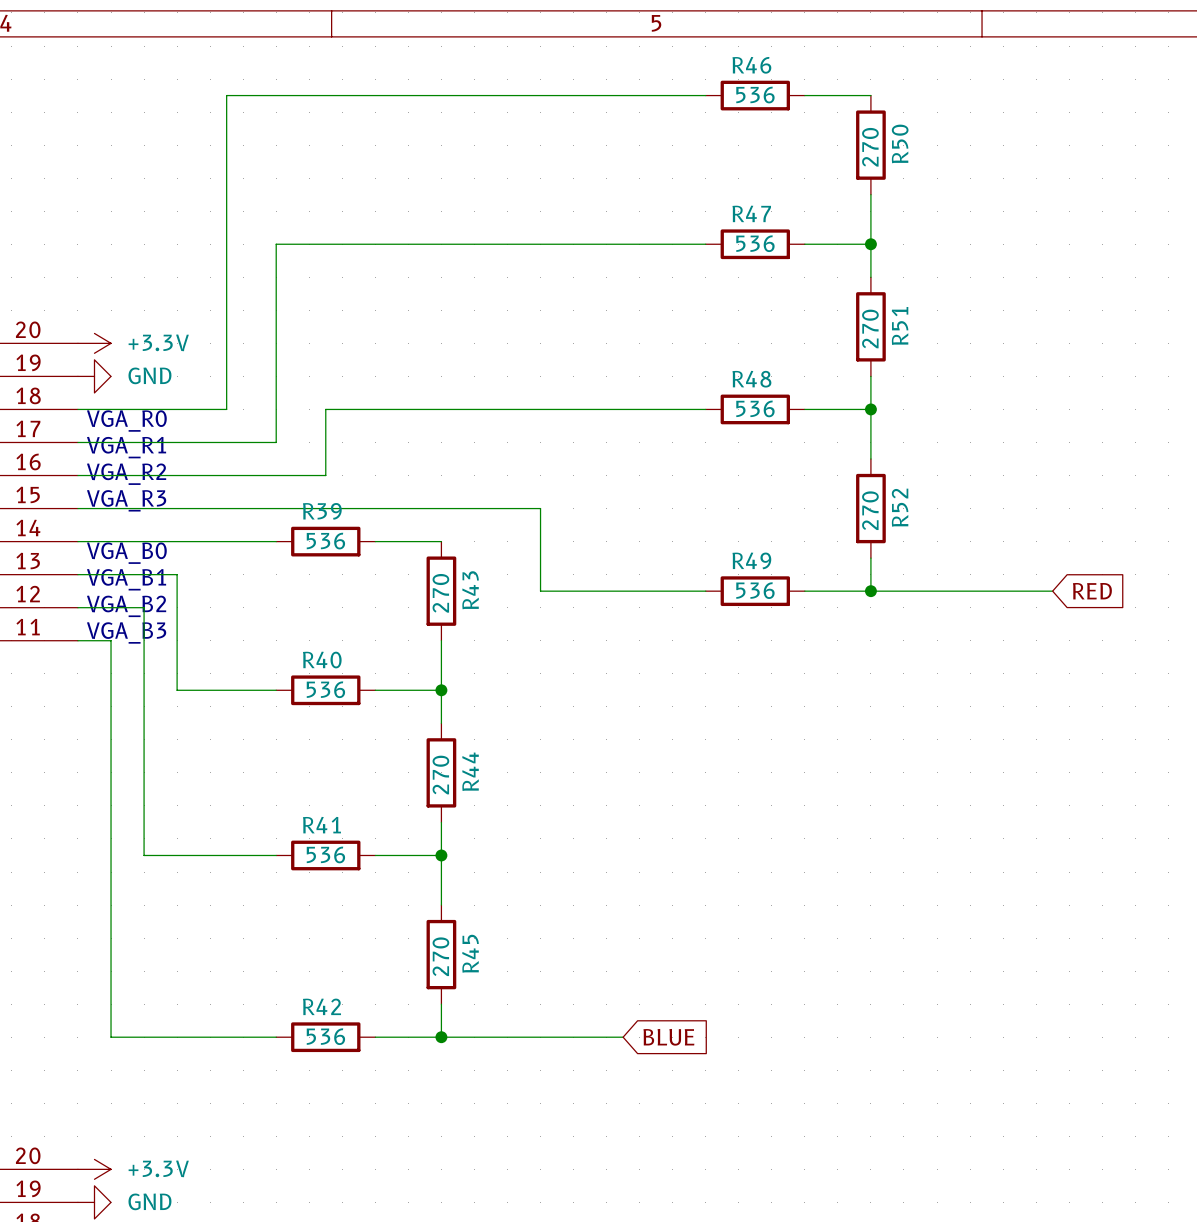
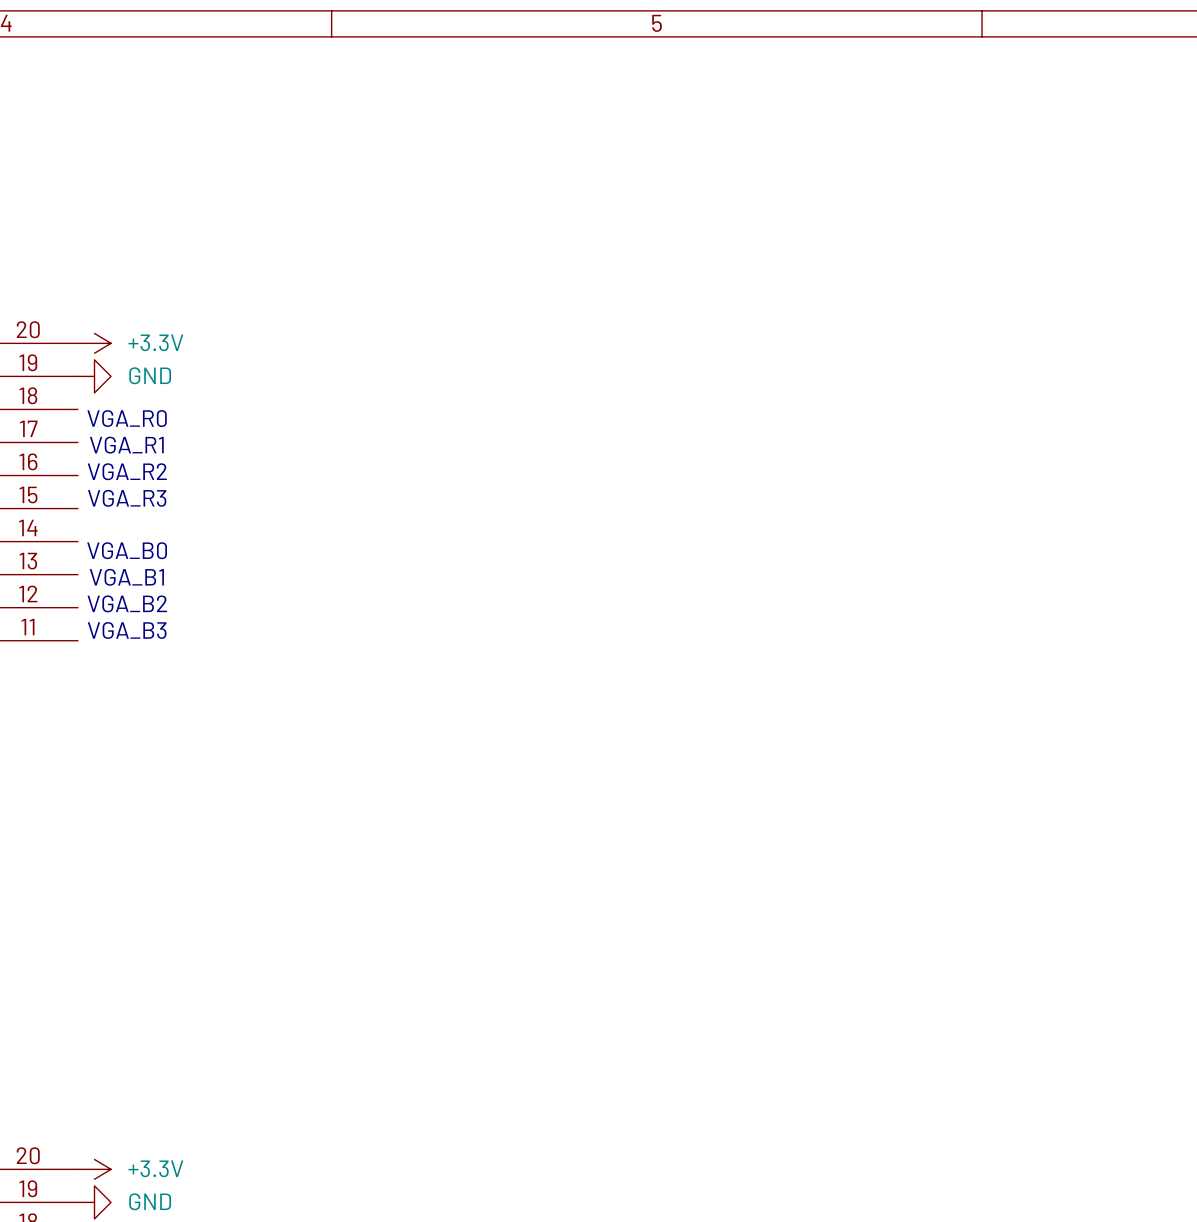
wire: (705, 95) (226, 95) (226, 409) (77, 409) -> none
R46: 536 (755, 95) -> none
wire: (804, 95) (870, 95) -> none
R50: 270 (870, 145) -> none
wire: (870, 194) (870, 277) -> none
wire: (705, 244) (276, 244) (276, 442) (77, 442) -> none
R47: 536 (755, 244) -> none
wire: (804, 244) (870, 244) -> none
junction: (870, 244) -> none
R51: 270 (870, 326) -> none
wire: (870, 376) (870, 459) -> none
wire: (705, 409) (325, 409) (325, 475) (77, 475) -> none
R48: 536 (755, 409) -> none
wire: (804, 409) (870, 409) -> none
junction: (870, 409) -> none
wire: (77, 508) (540, 508) (540, 591) (705, 591) -> none
R52: 270 (870, 508) -> none
wire: (77, 541) (276, 541) -> none
R39: 536 (325, 541) -> none
wire: (375, 541) (441, 541) -> none
wire: (870, 558) (870, 591) -> none
wire: (77, 574) (177, 574) (177, 690) (276, 690) -> none
R43: 270 (441, 591) -> none
R49: 536 (755, 591) -> none
wire: (804, 591) (1052, 591) -> none
junction: (870, 591) -> none
global label: RED (1092, 591) -> none
wire: (77, 607) (144, 607) (144, 855) (276, 855) -> none
wire: (77, 640) (111, 640) (111, 1037) (276, 1037) -> none
wire: (441, 640) (441, 723) -> none
R40: 536 (325, 690) -> none
wire: (375, 690) (441, 690) -> none
junction: (441, 690) -> none
R44: 270 (441, 772) -> none
wire: (441, 822) (441, 905) -> none
R41: 536 (325, 855) -> none
wire: (375, 855) (441, 855) -> none
junction: (441, 855) -> none
R45: 270 (441, 954) -> none
wire: (441, 1004) (441, 1037) -> none
R42: 536 (325, 1037) -> none
wire: (375, 1037) (623, 1037) -> none
junction: (441, 1037) -> none
global label: BLUE (668, 1037) -> none

